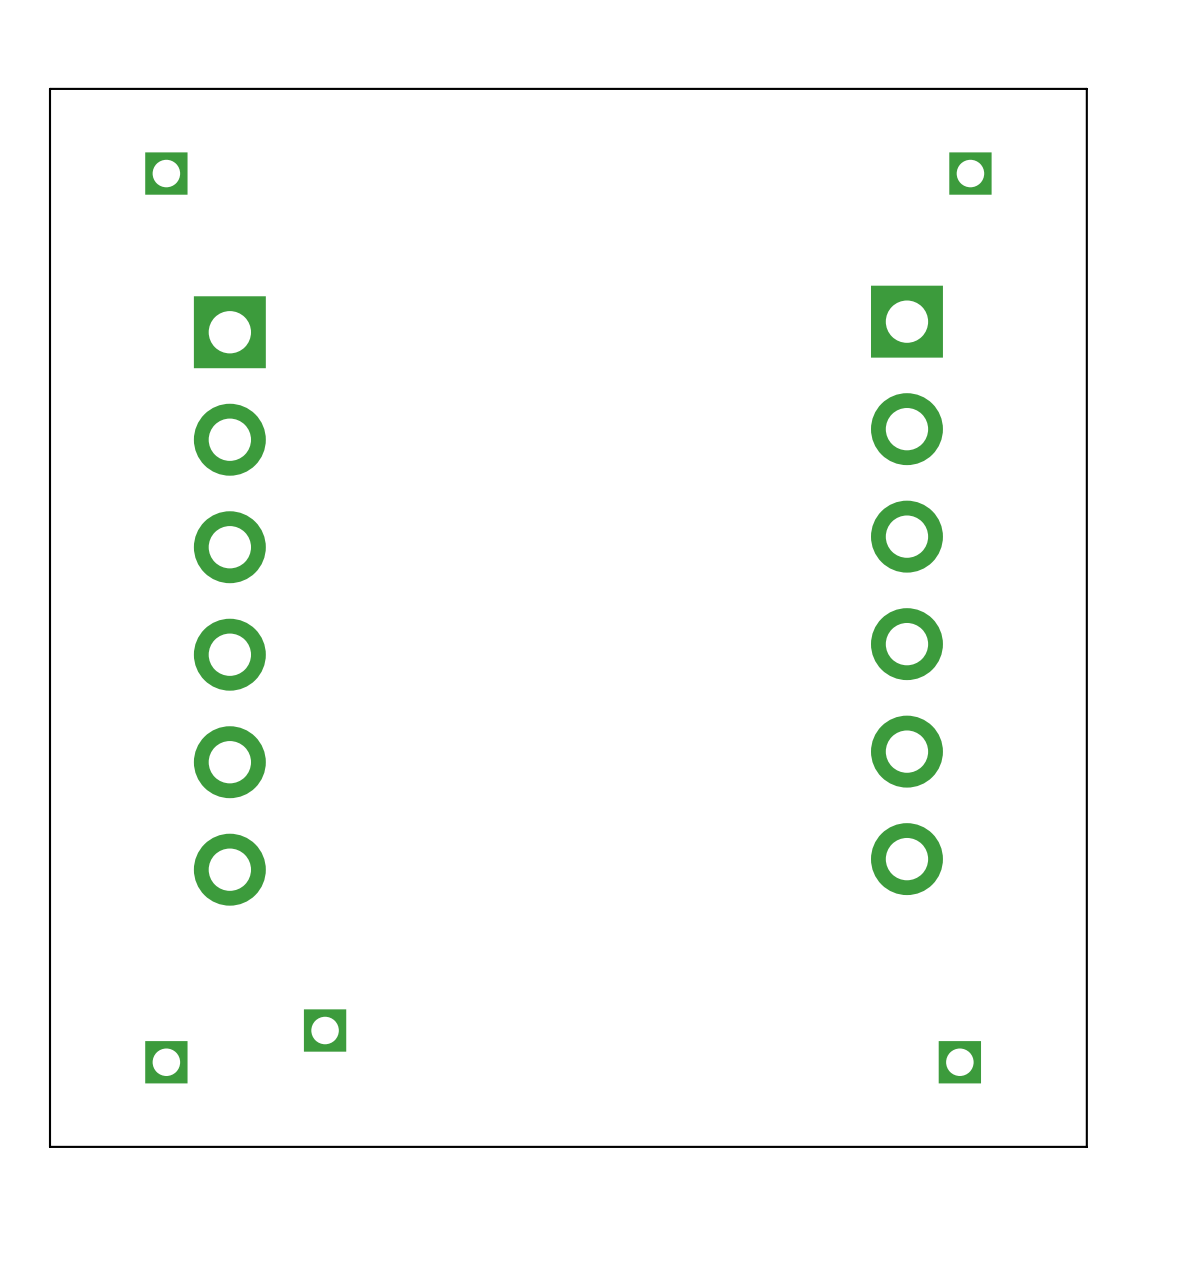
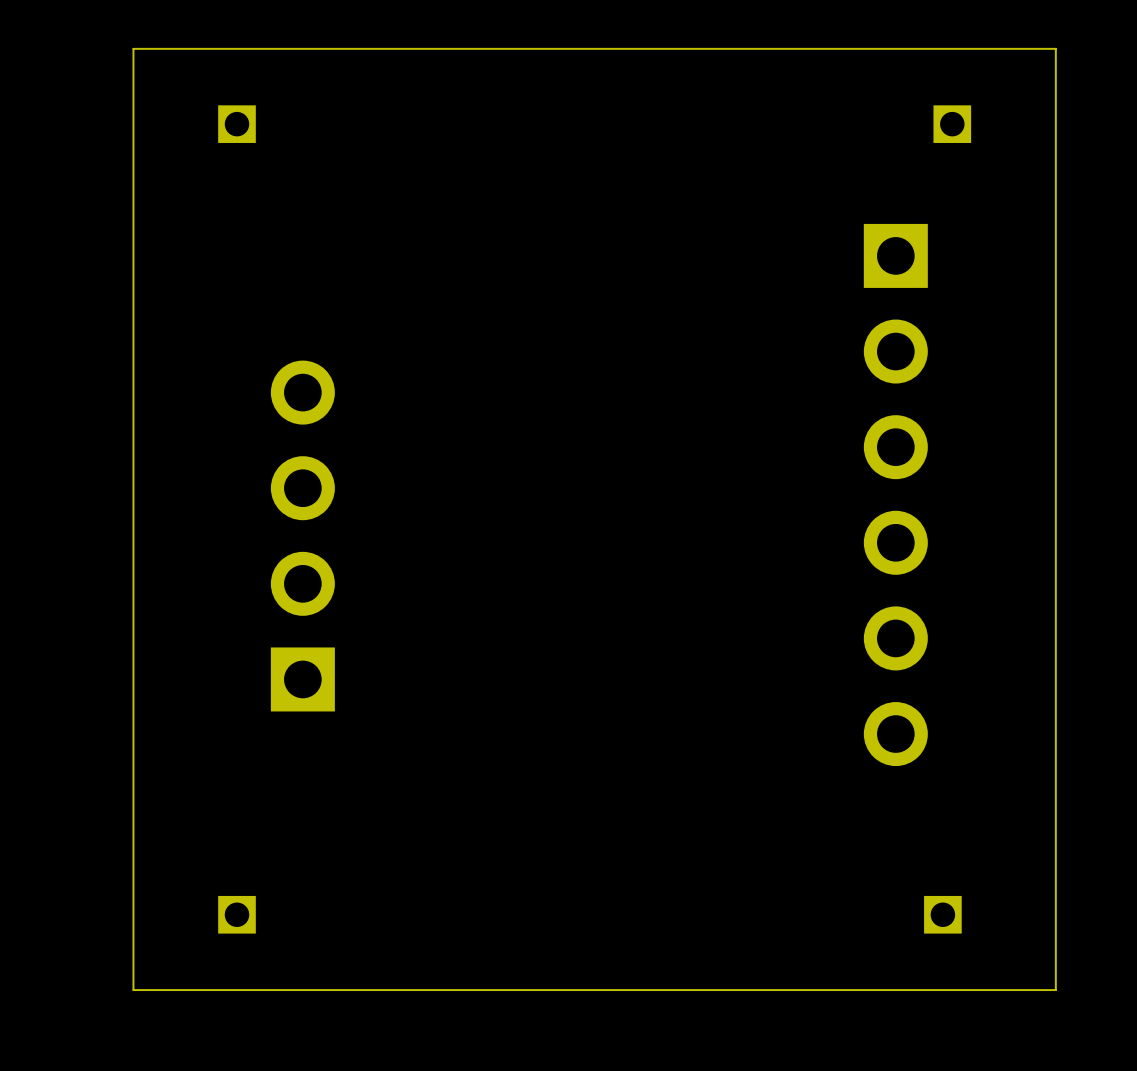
part footprint: [193, 296, 266, 906] -> [270, 360, 335, 712]
part: (325, 1030) -> none

